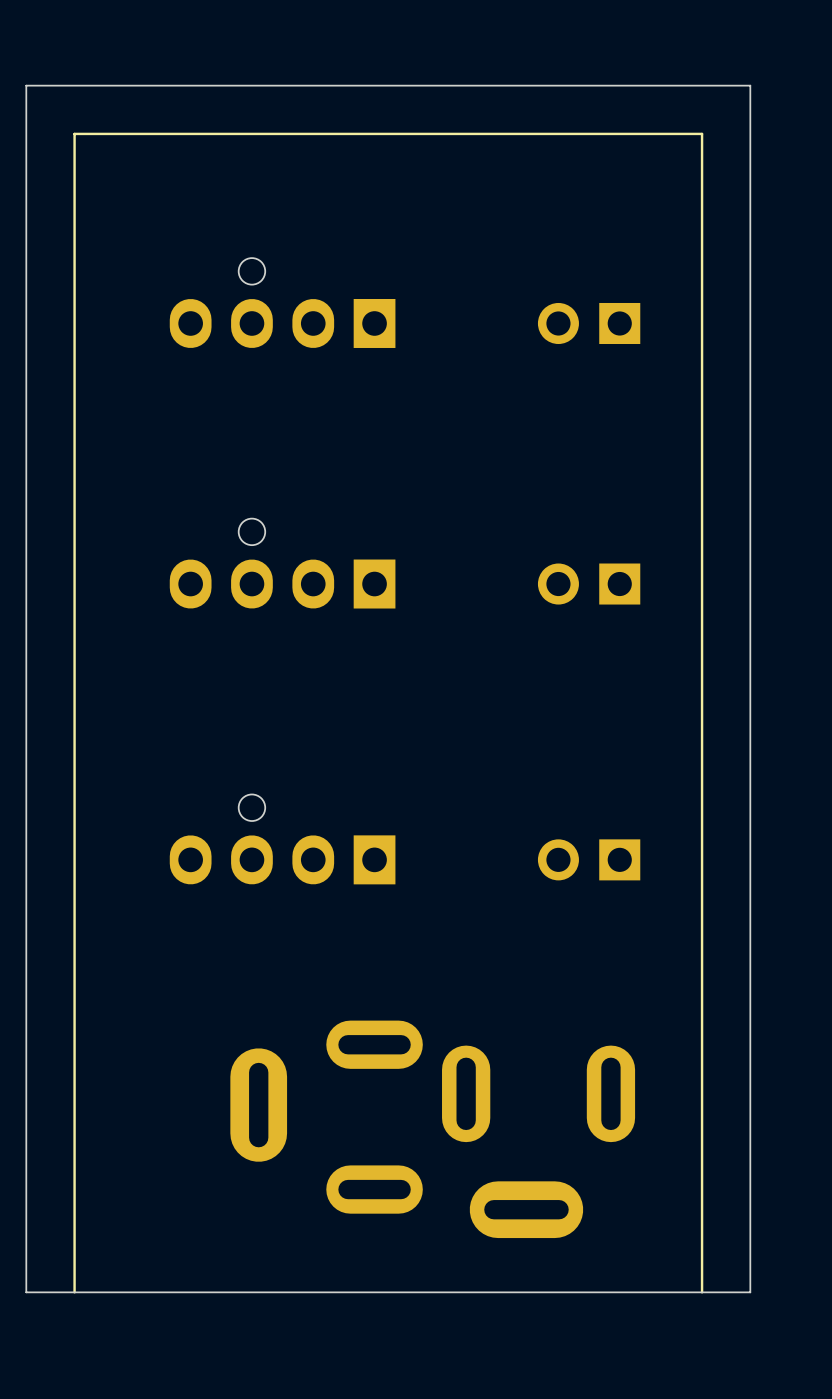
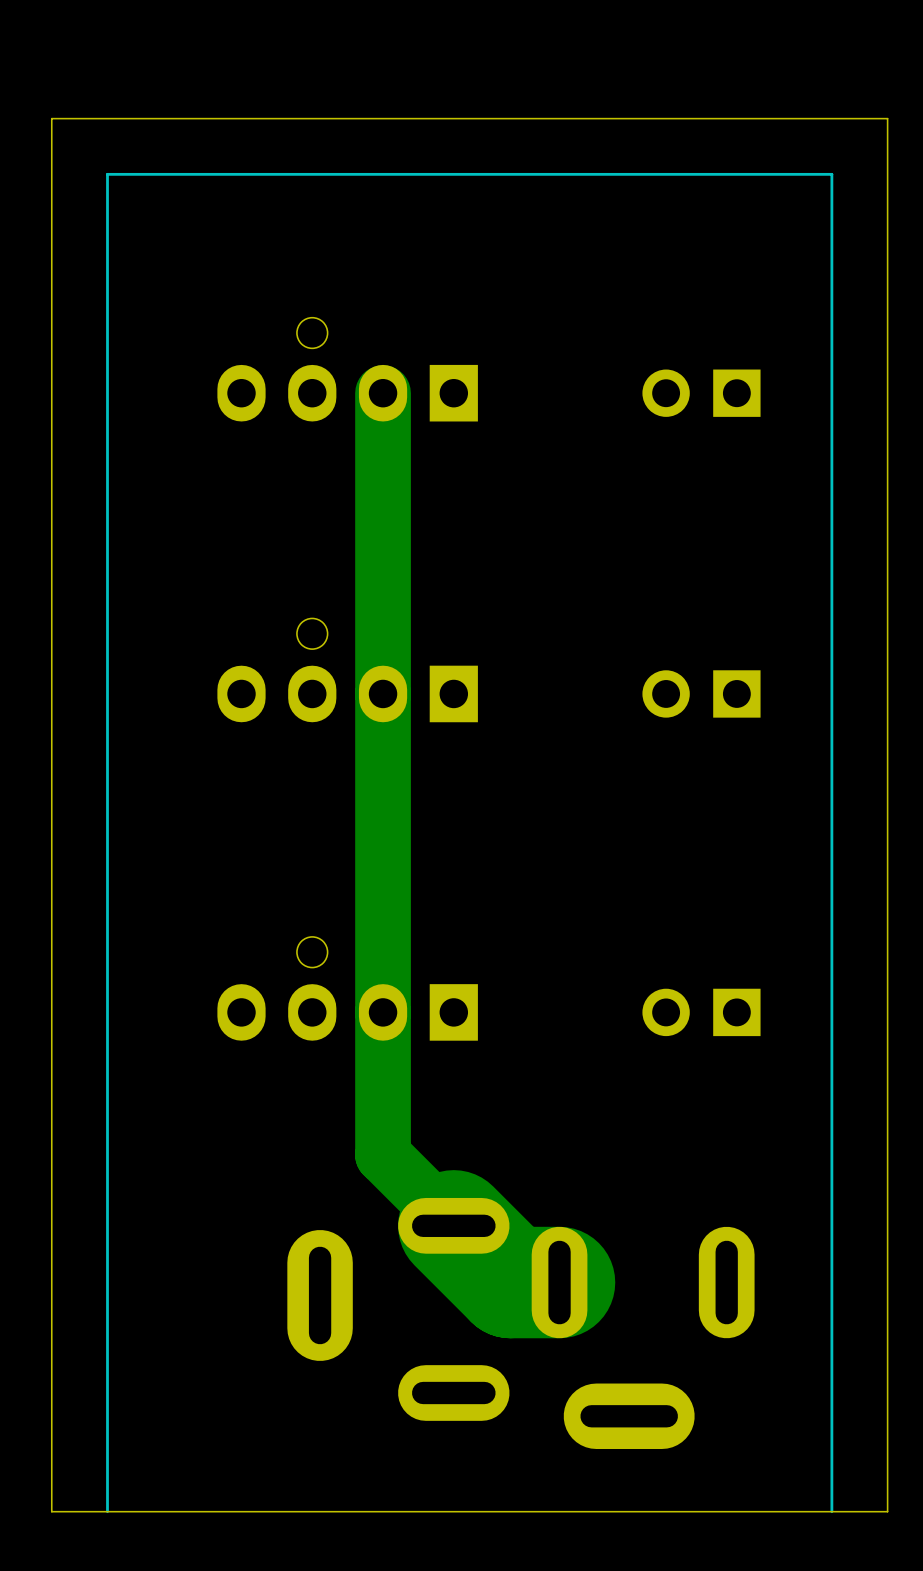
track: none -> (383, 393) (383, 1155) (510, 1282) (559, 1282)

